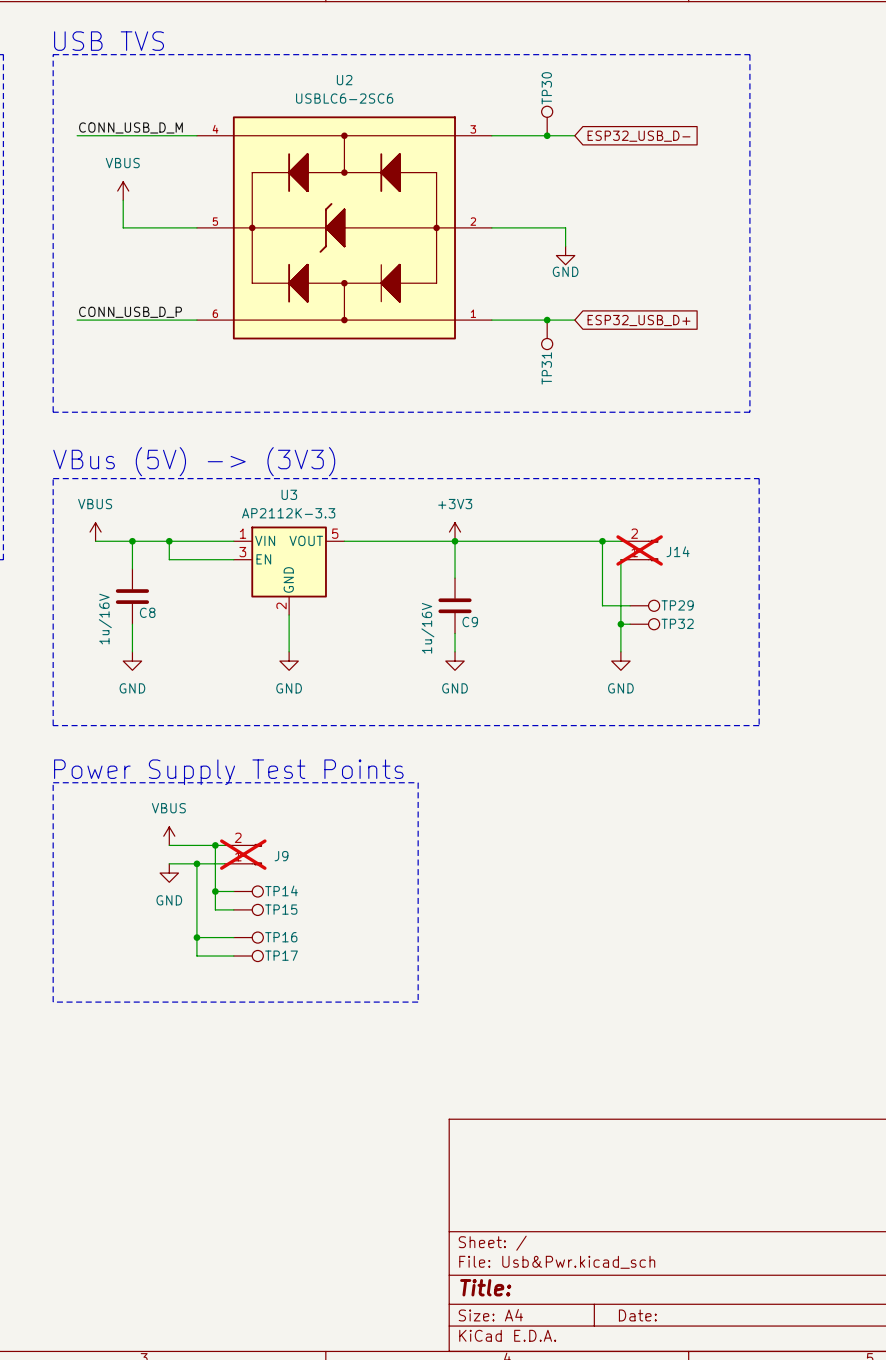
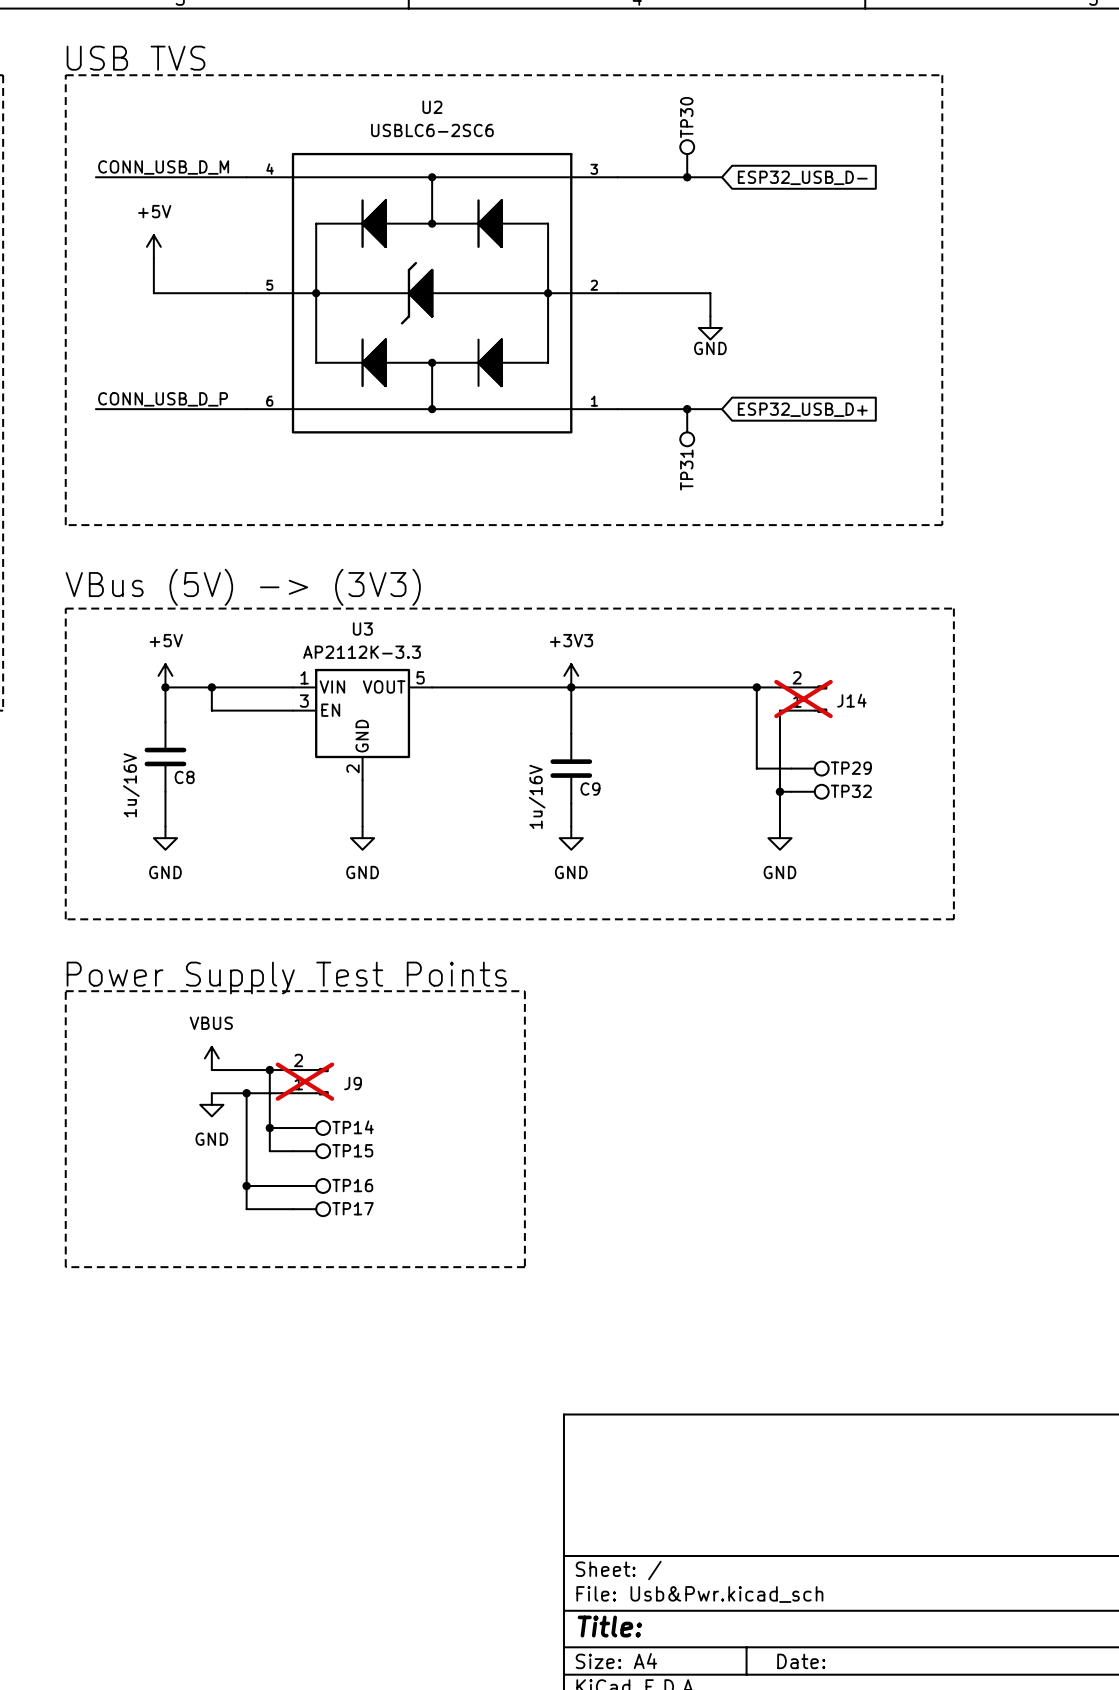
power symbol: VBUS (123, 191) -> +5V (153, 246)
power symbol: VBUS (95, 532) -> none
power symbol: none -> +5V (165, 675)
wire: (95, 541) (132, 541) -> none

